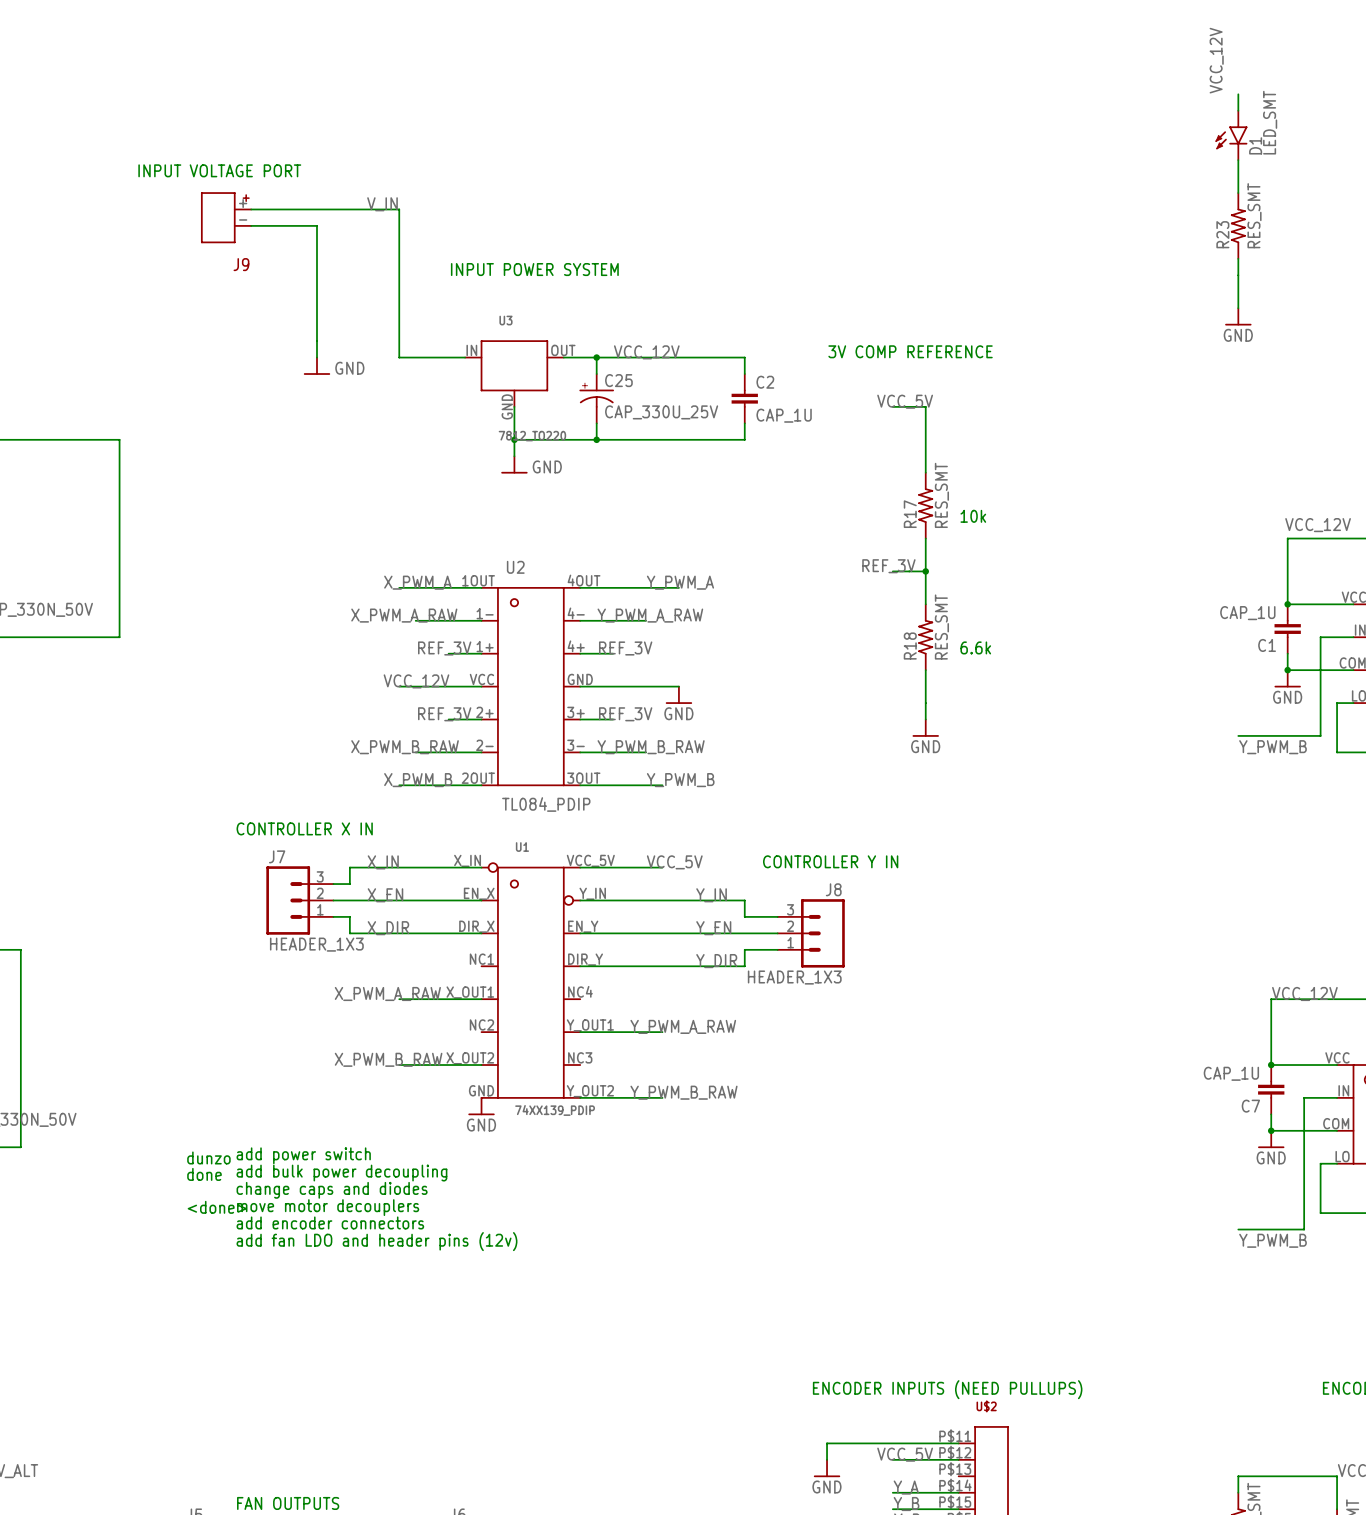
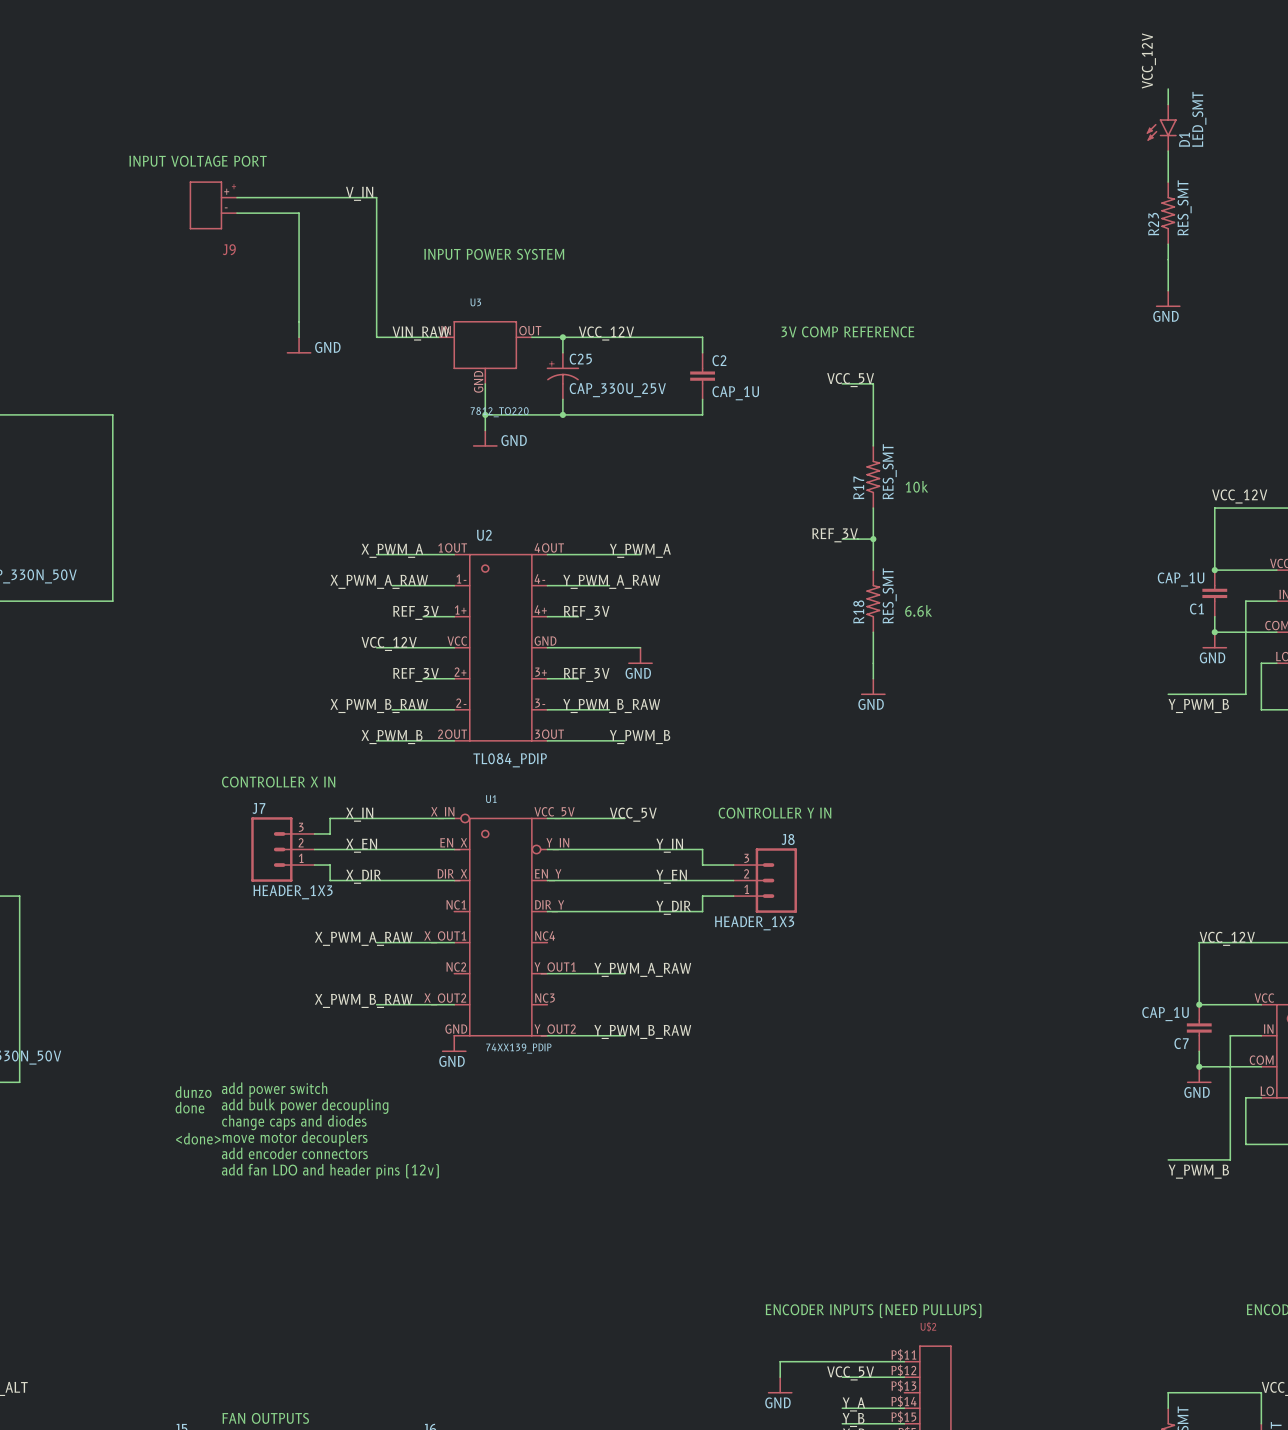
label: none -> VIN_RAW (421, 333)

